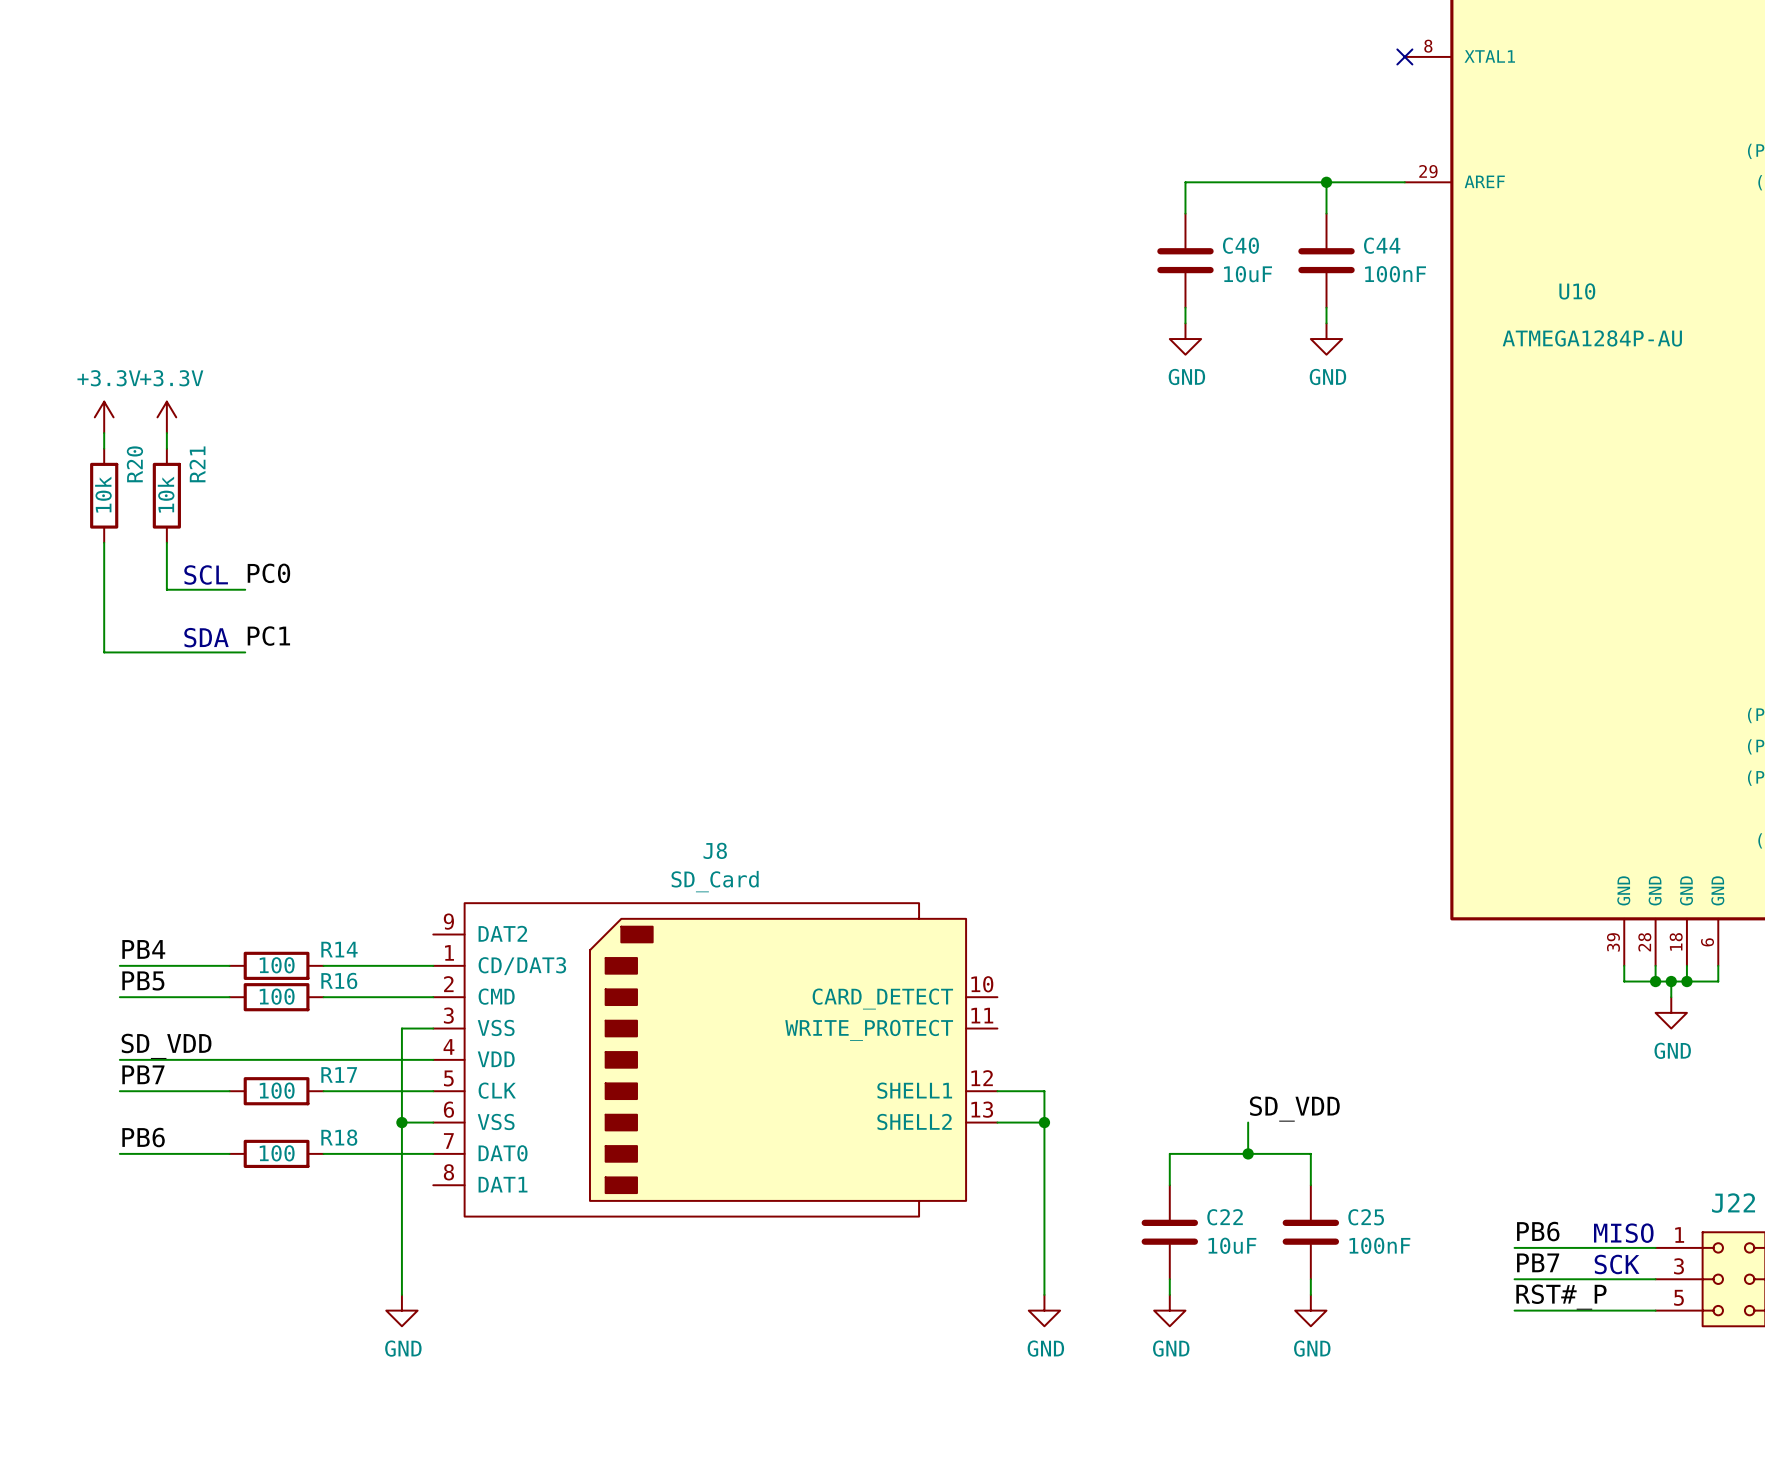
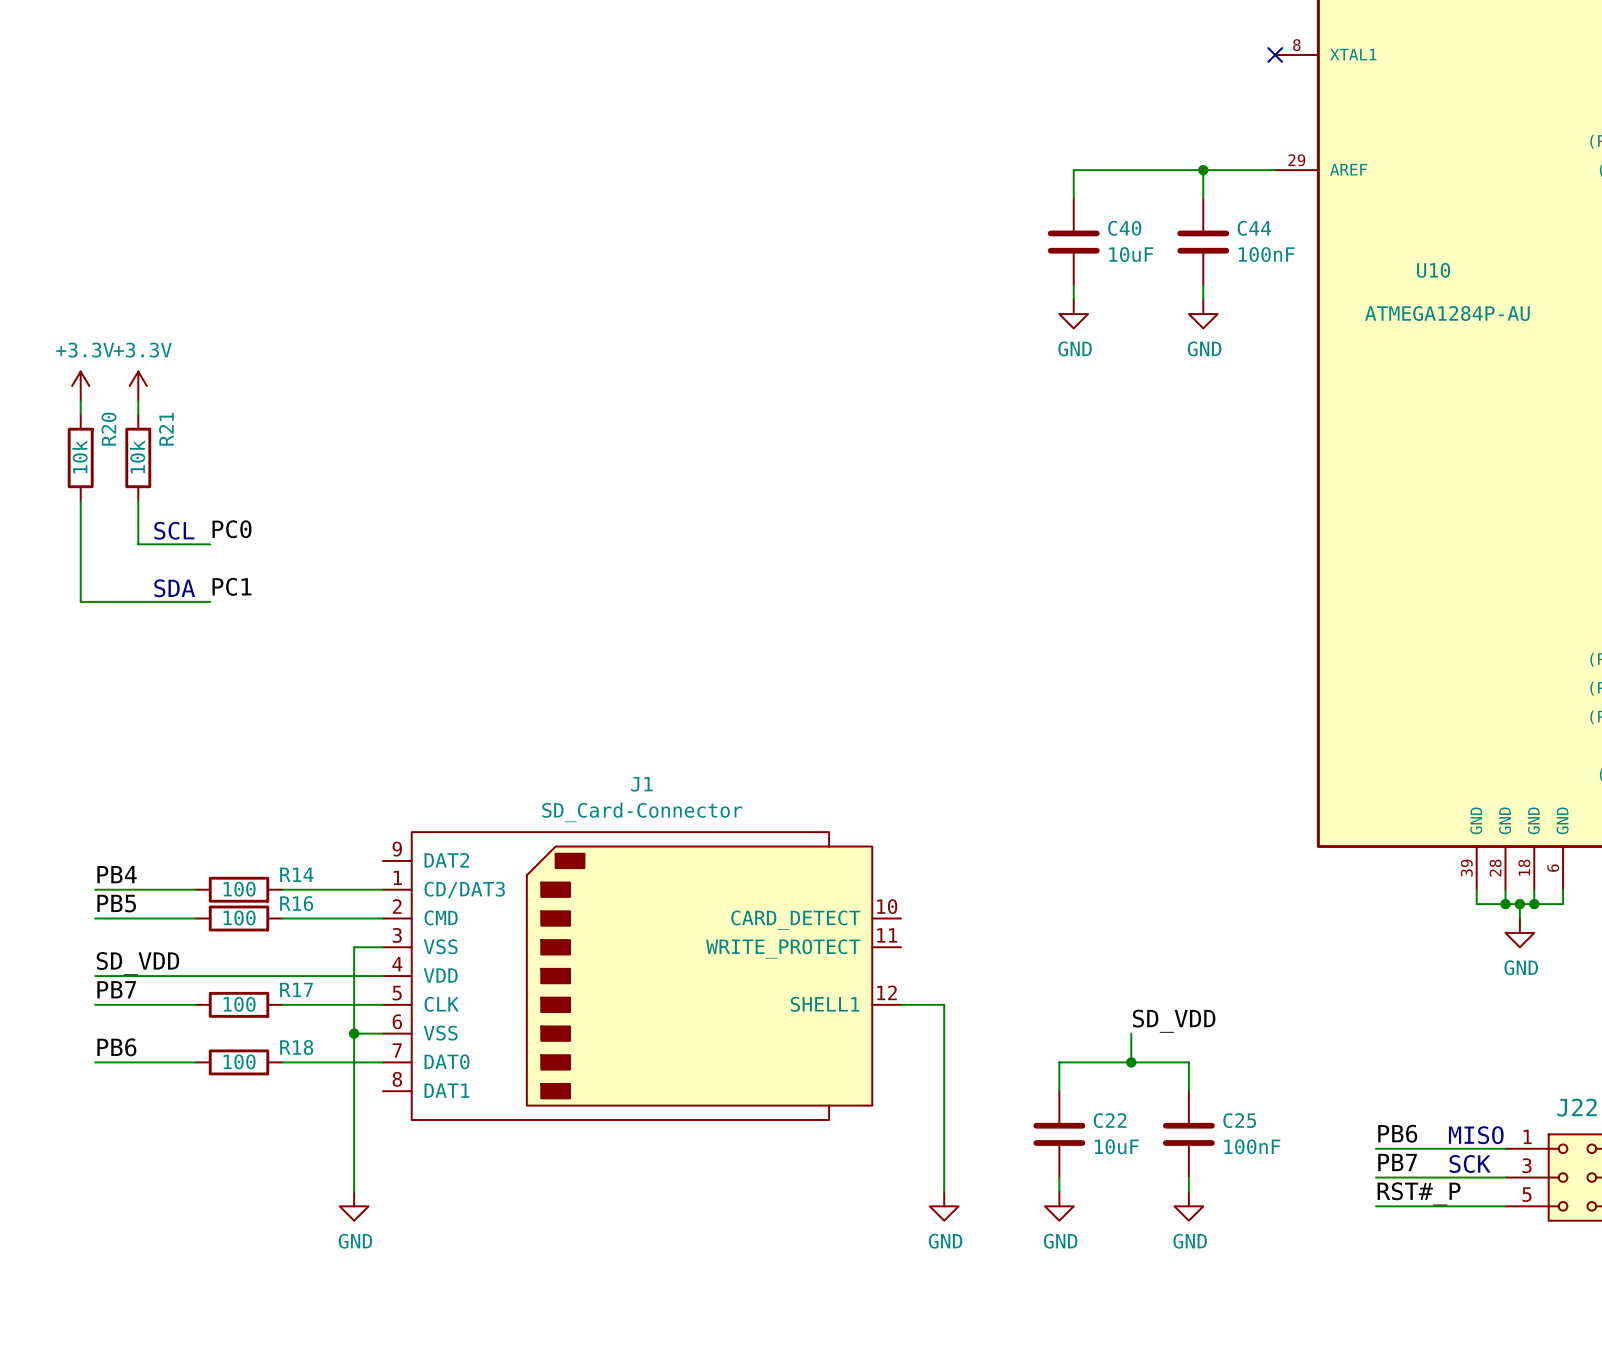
J8: SD_Card (715, 1059) -> none
J1: none -> SD_Card-Connector (641, 976)
wire: (997, 1122) (1044, 1122) -> none
junction: (1044, 1122) -> none

